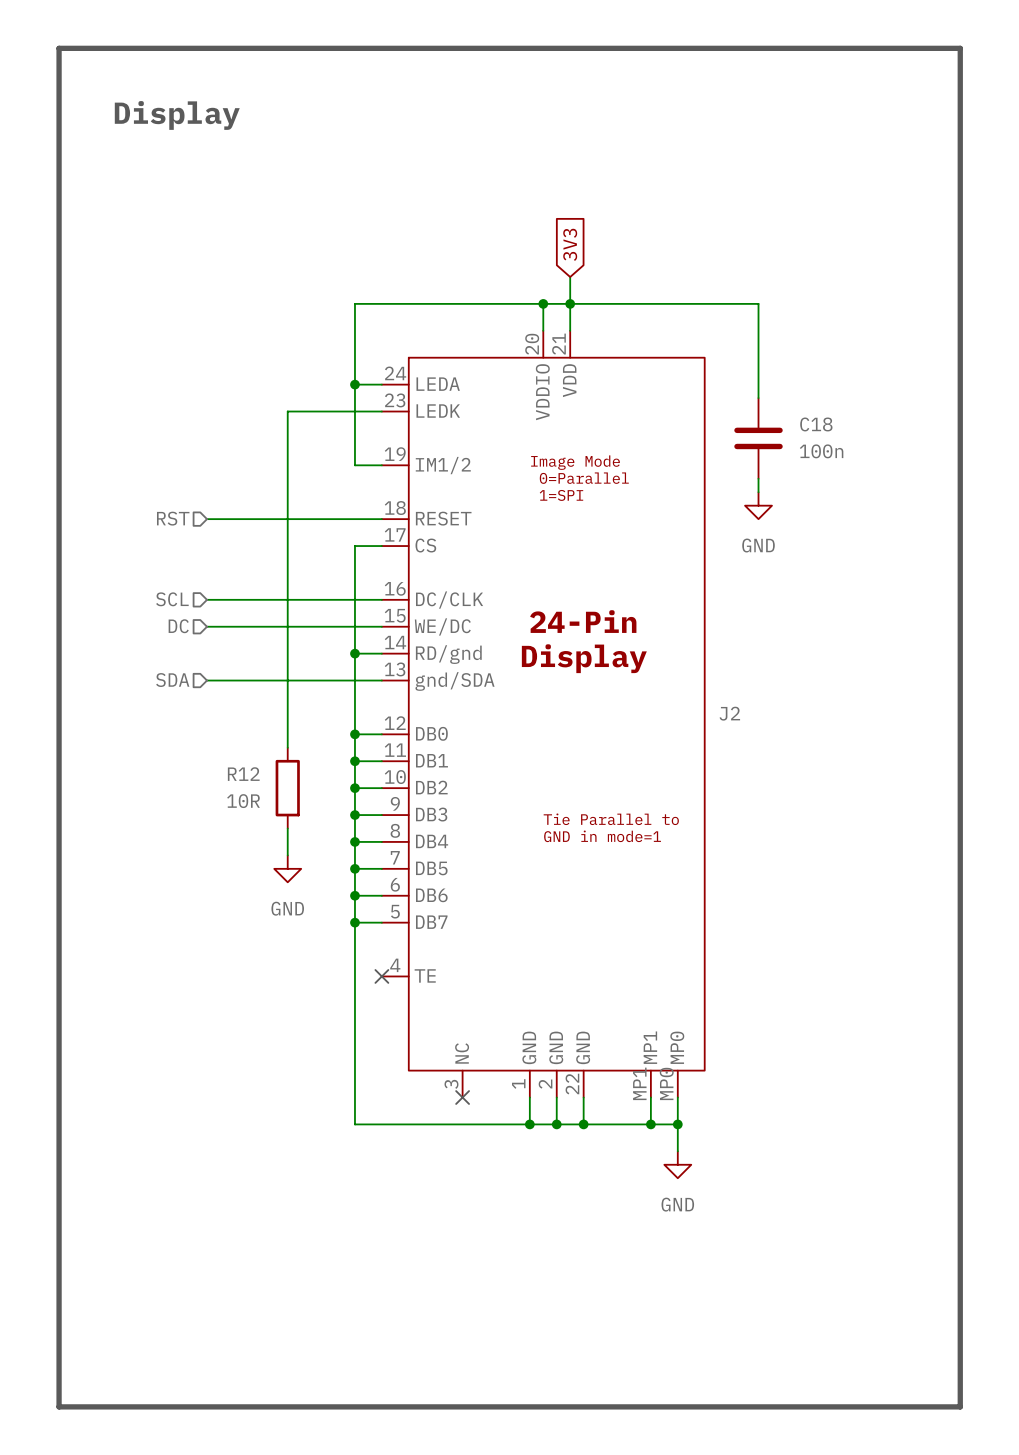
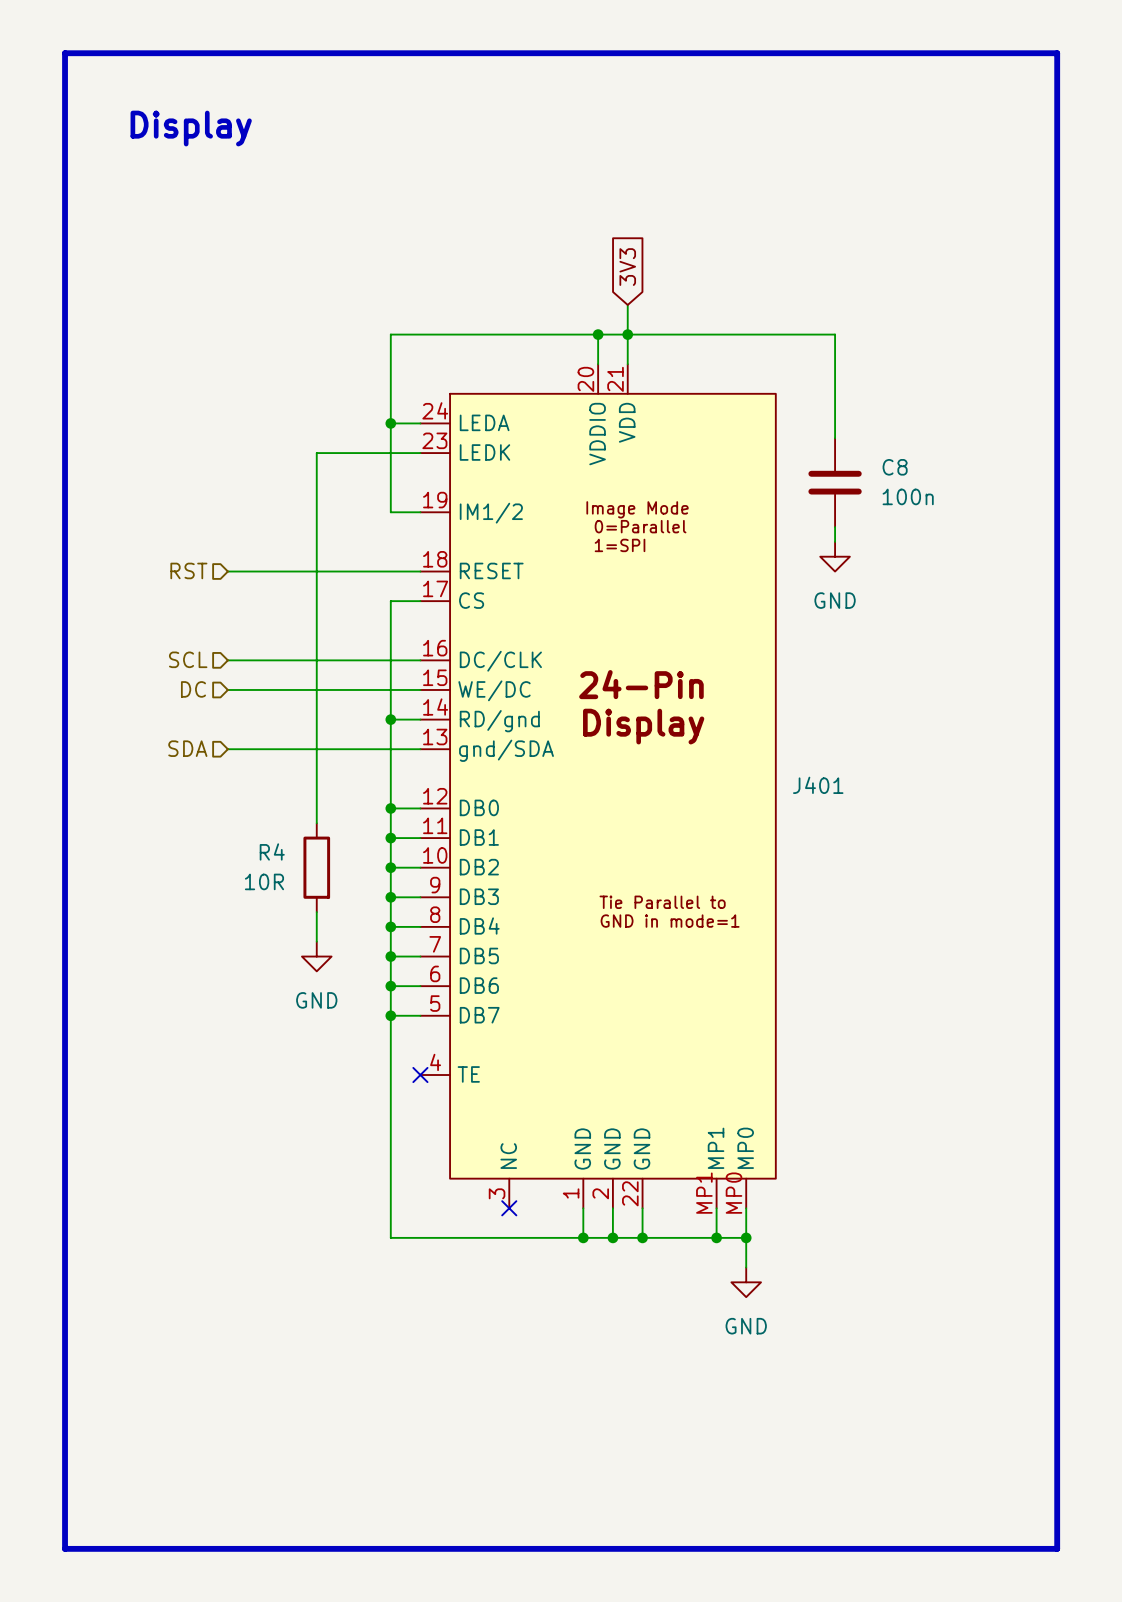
C18 name: C18 (816, 424) -> C8 (895, 467)
J2 name: J2 (729, 713) -> J401 (818, 785)
R12 name: R12 (243, 774) -> R4 (272, 851)

